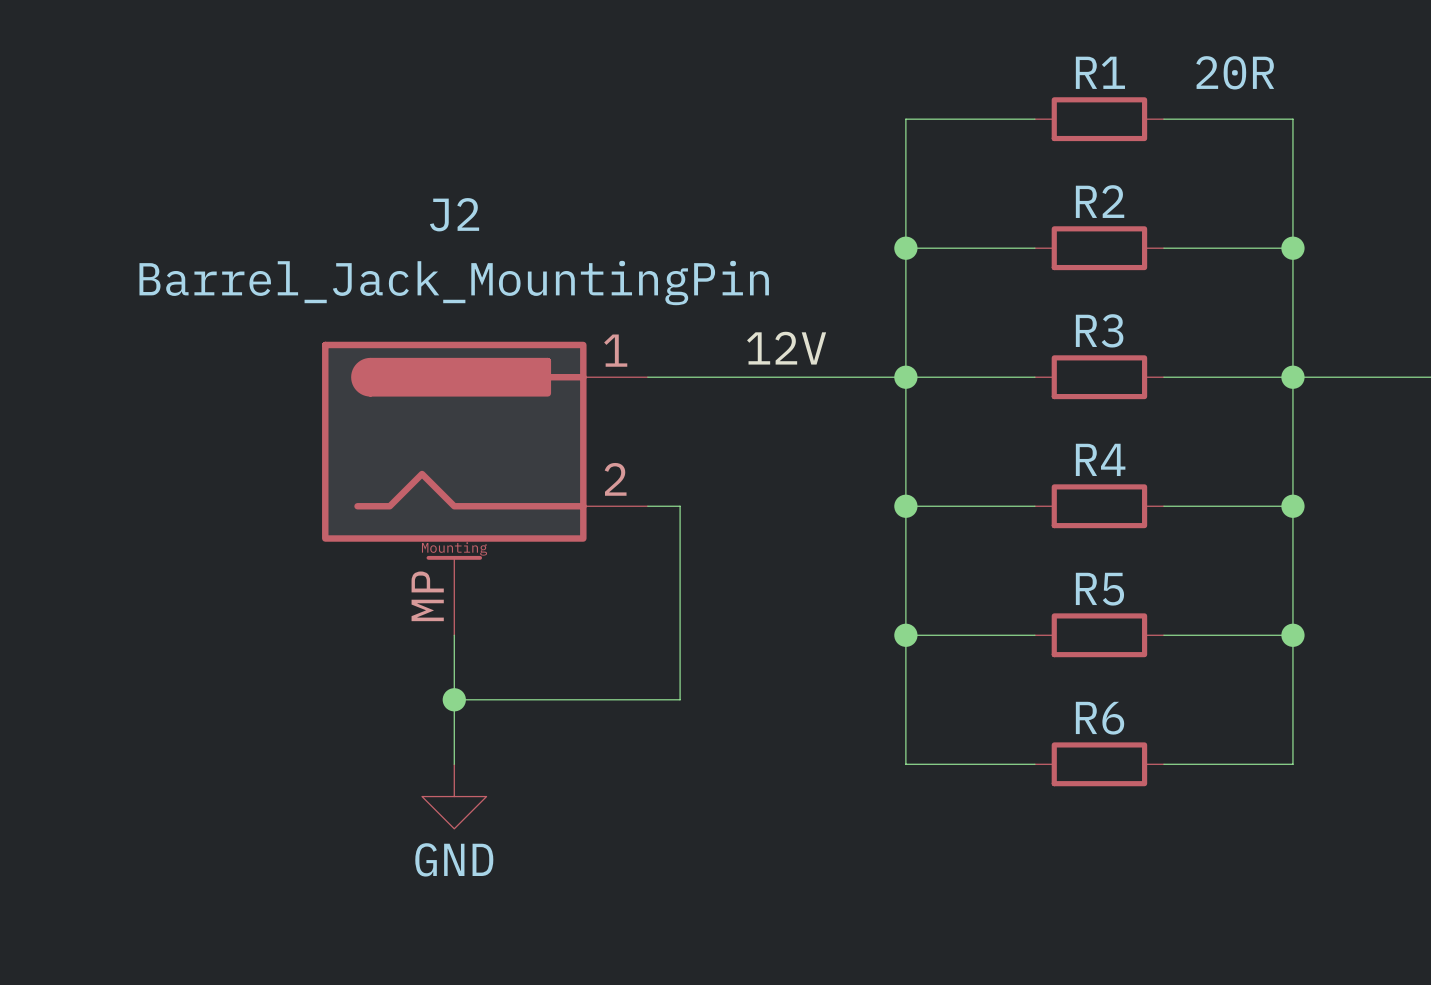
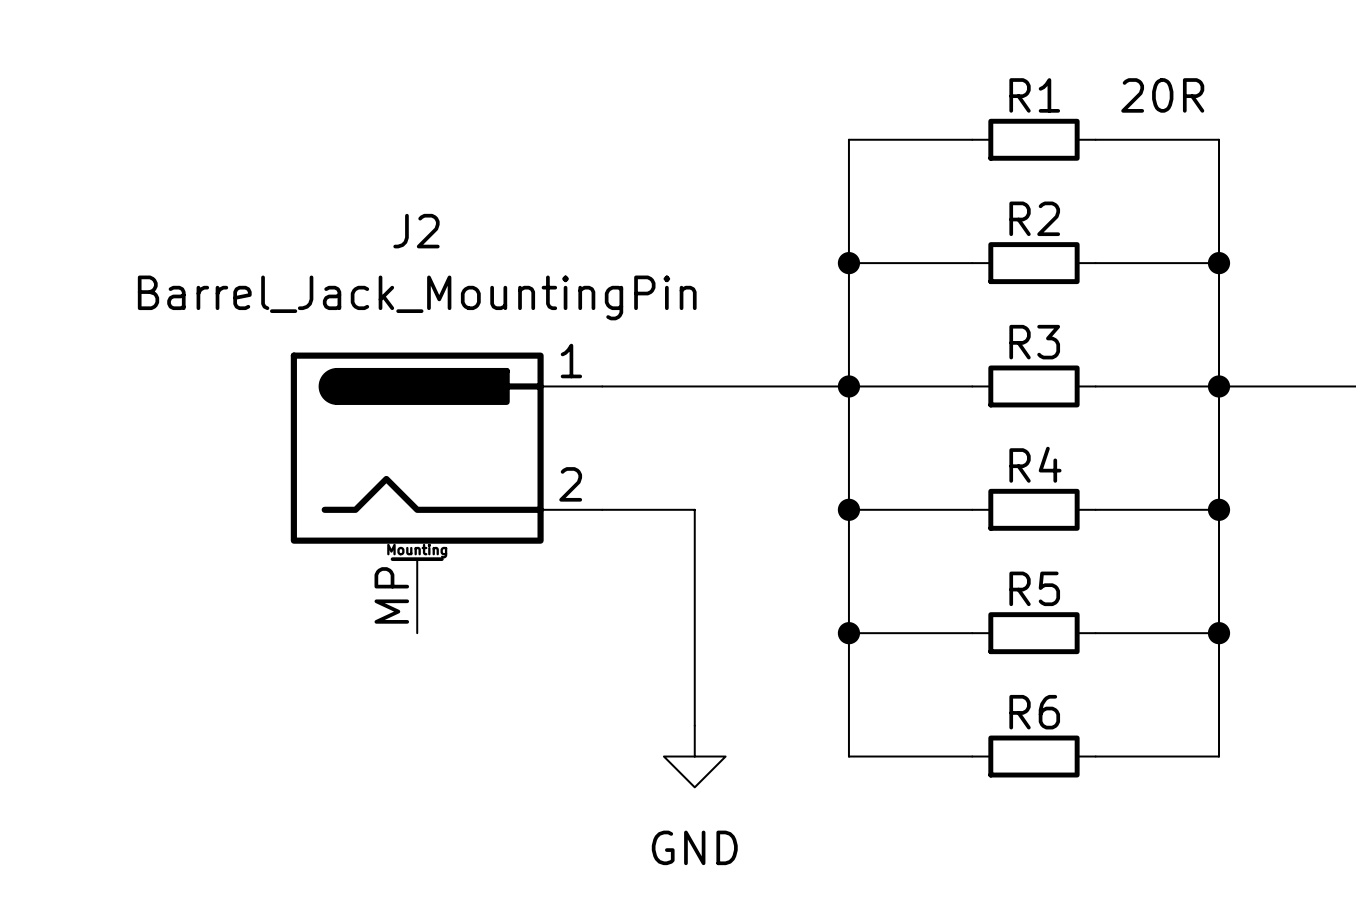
label: 12V (786, 348) -> none
wire: (680, 506) (680, 699) (454, 699) -> (633, 509) (694, 509) (694, 725)
wire: (454, 635) (454, 764) -> none
junction: (454, 699) -> none
power symbol position: GND (454, 796) -> GND (694, 756)
power symbol text position: GND (454, 859) -> GND (694, 847)

